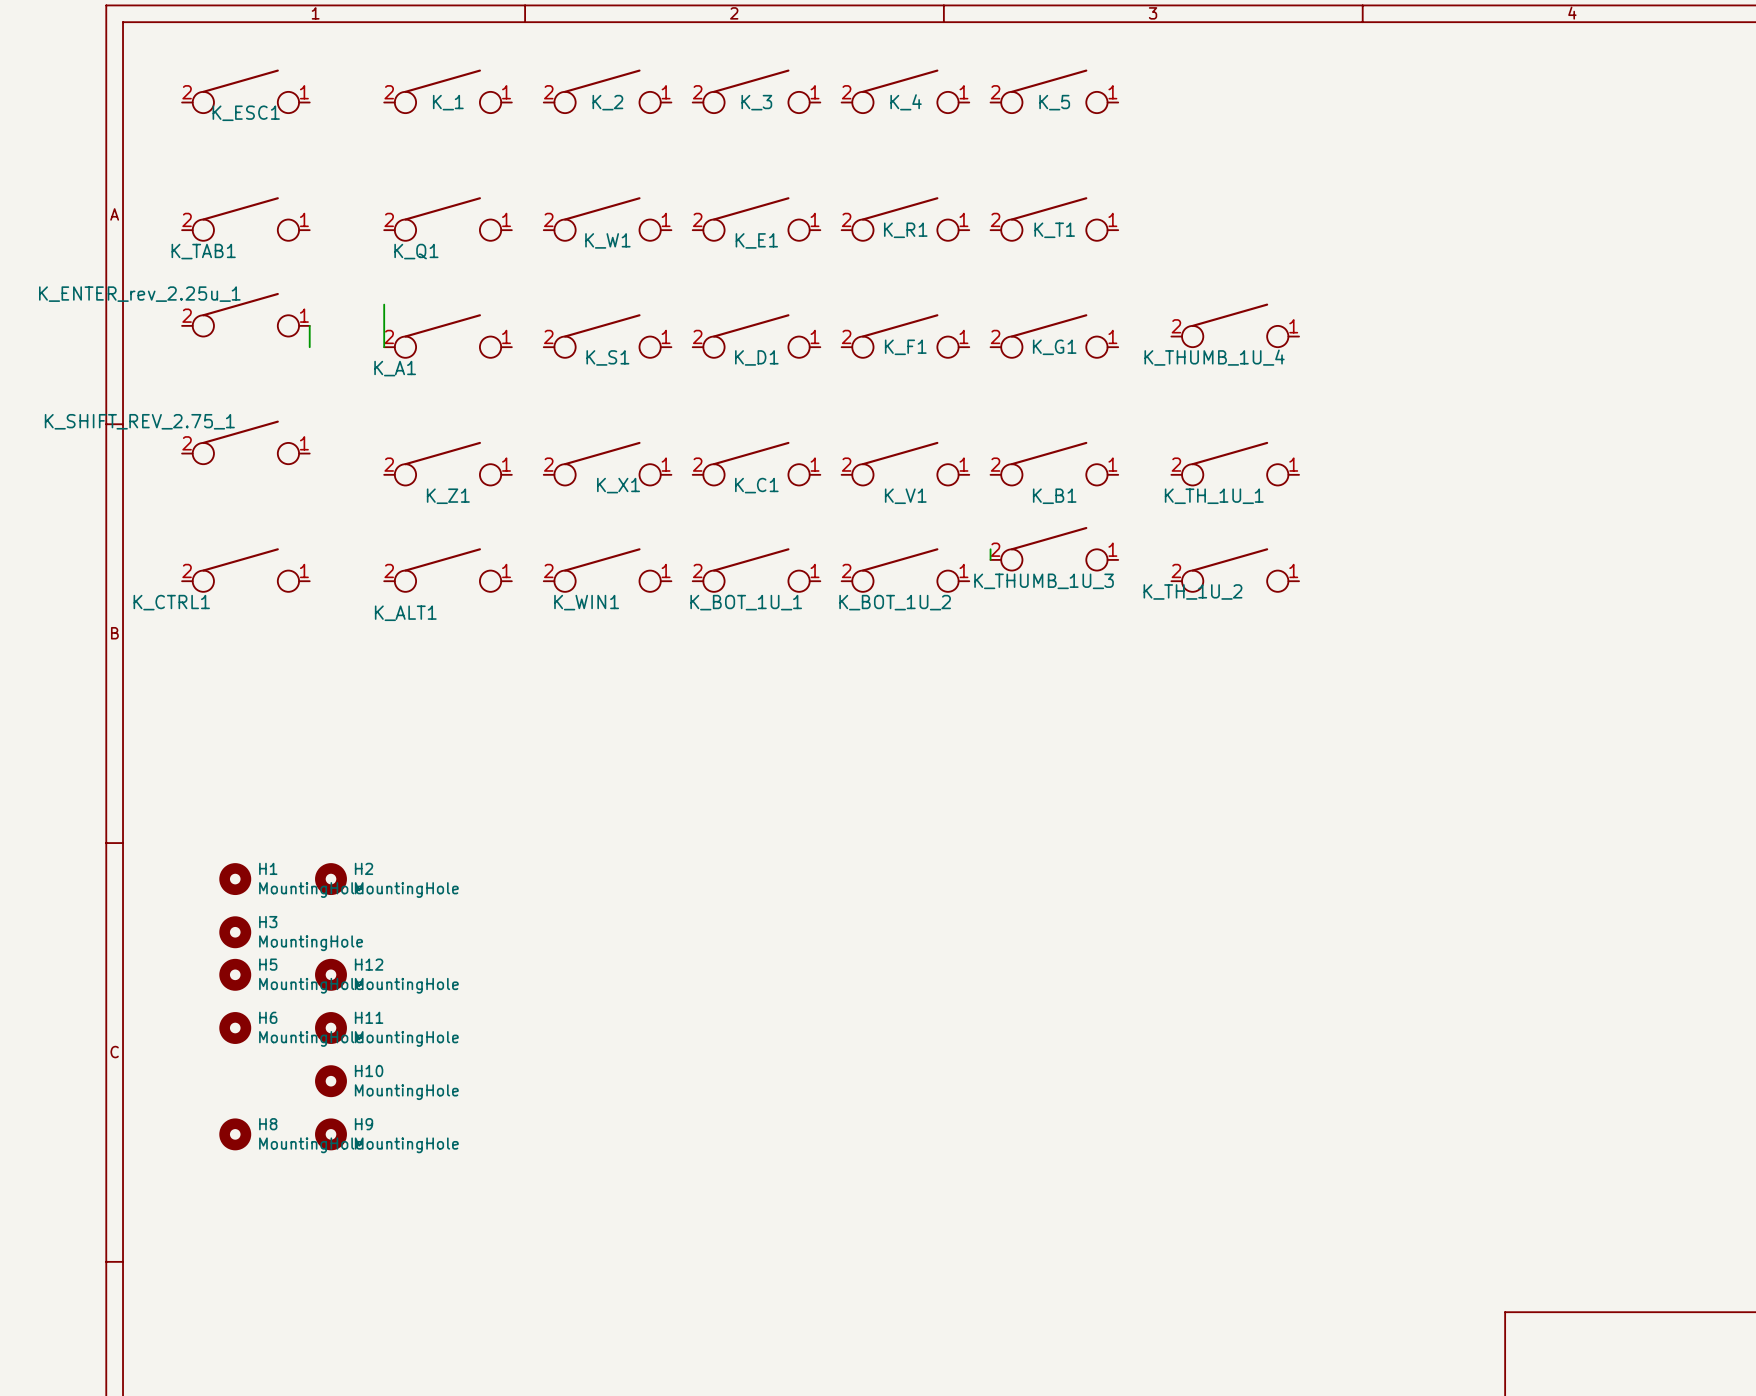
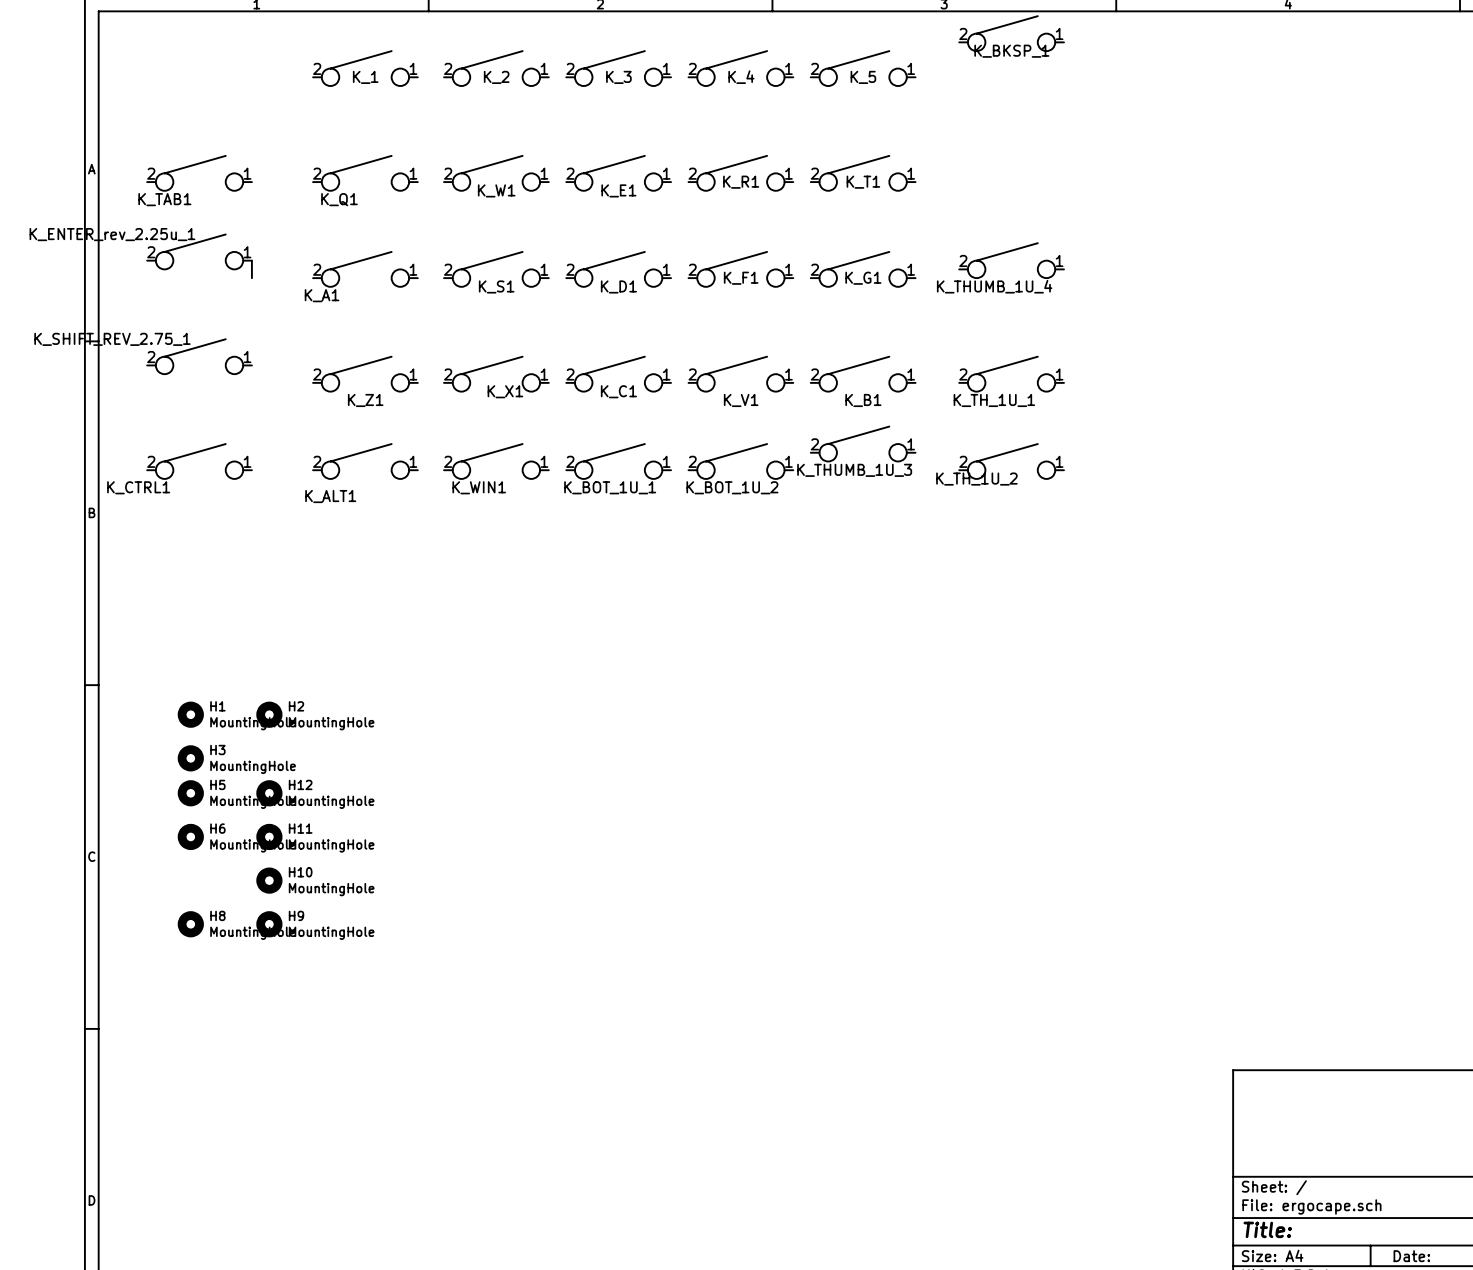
K_BKSP_1: none -> (1011, 33)
K_ESC1: (245, 91) -> none
wire: (384, 304) (384, 347) -> none
wire: (990, 549) (990, 559) -> none

